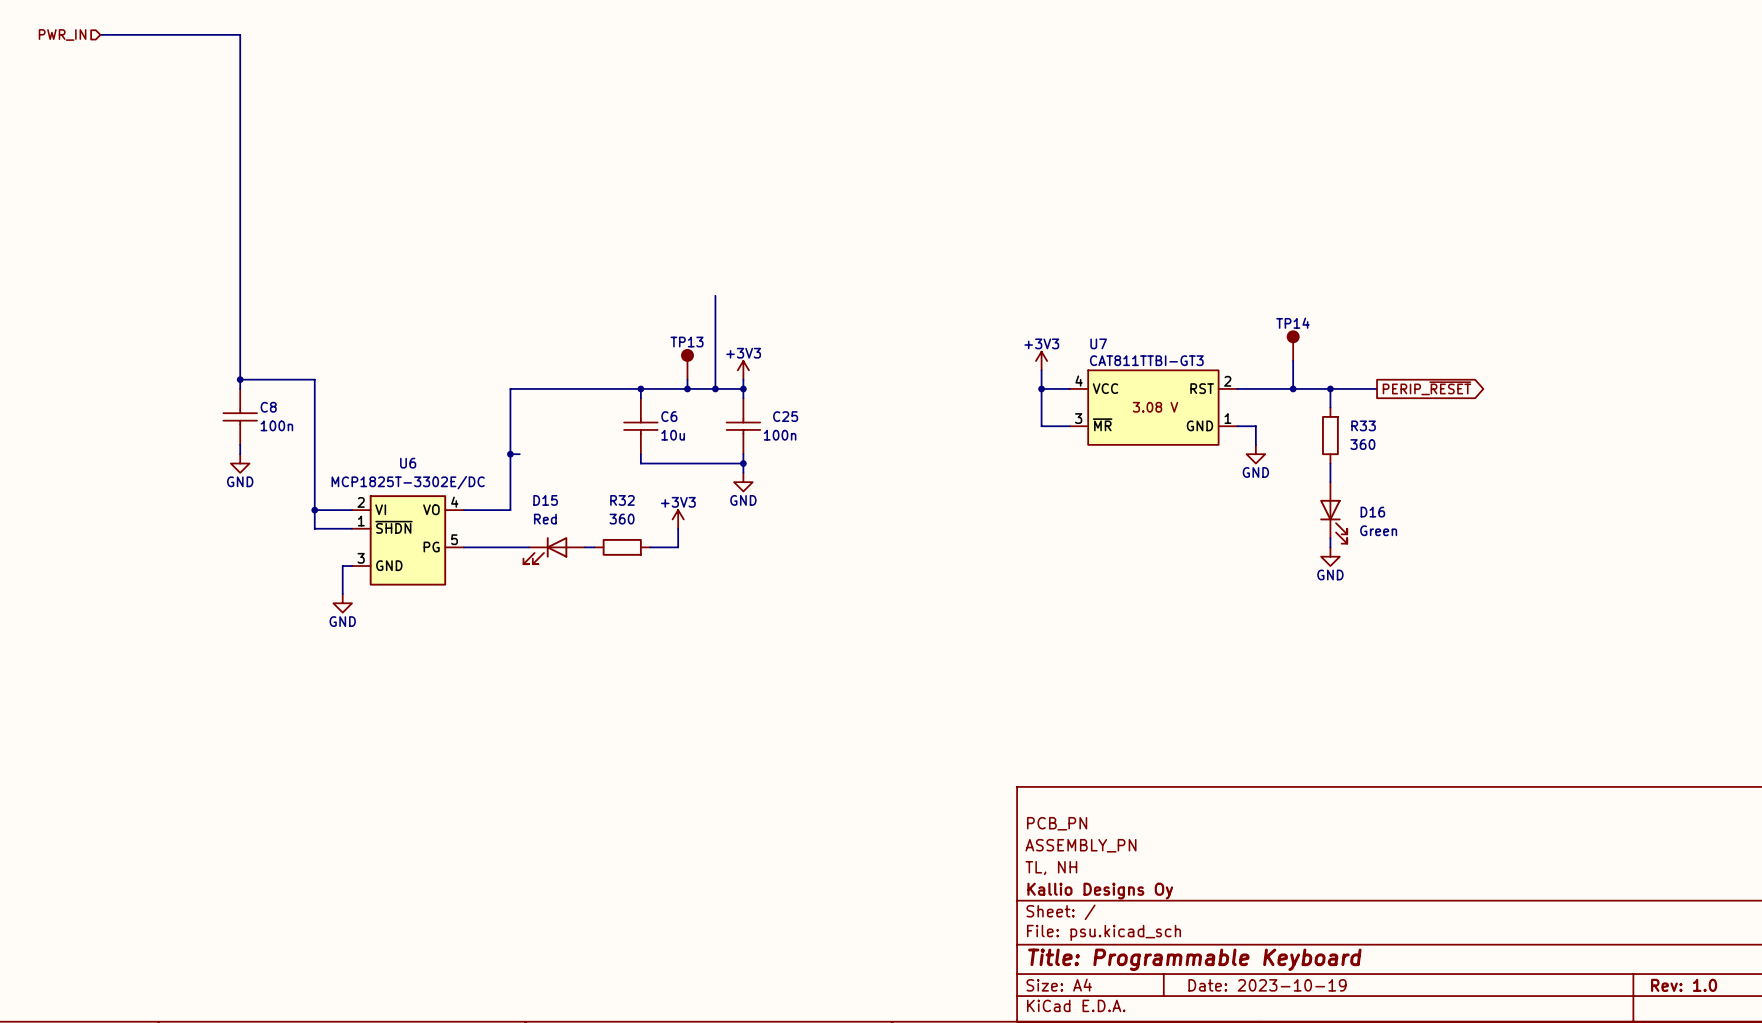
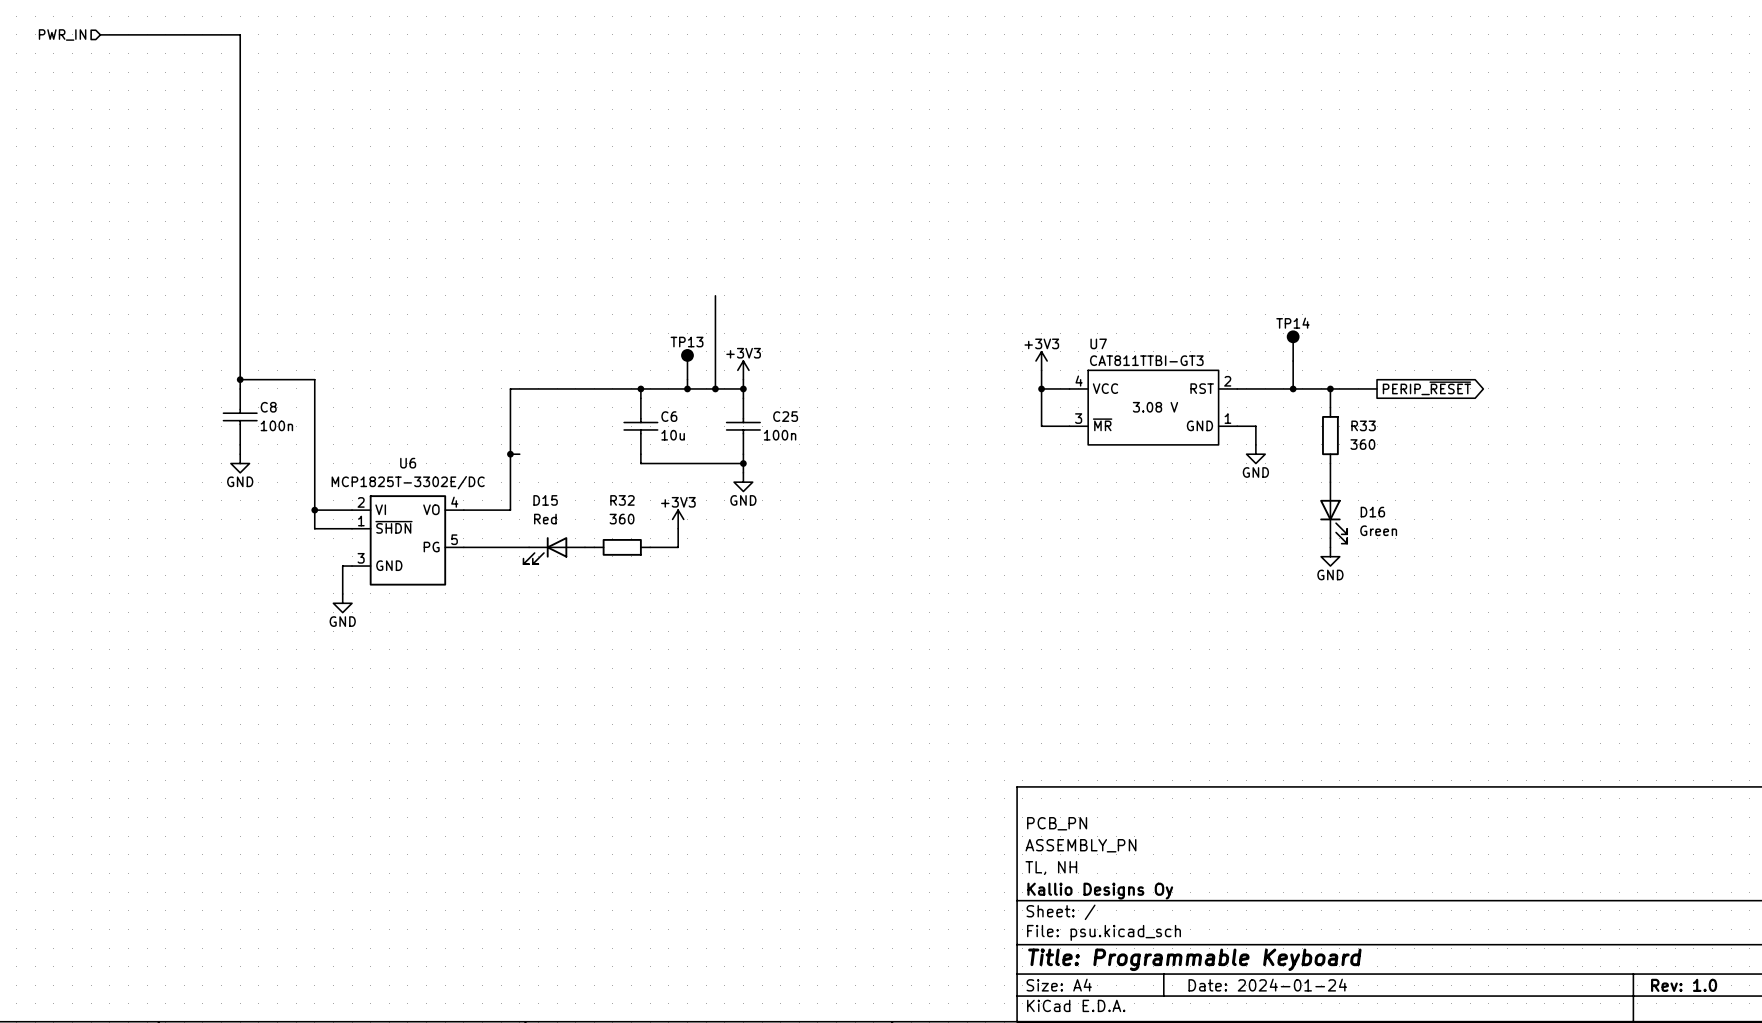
title block: Date: 2023-10-19 (1267, 985) -> Date: 2024-01-24 (1267, 985)

